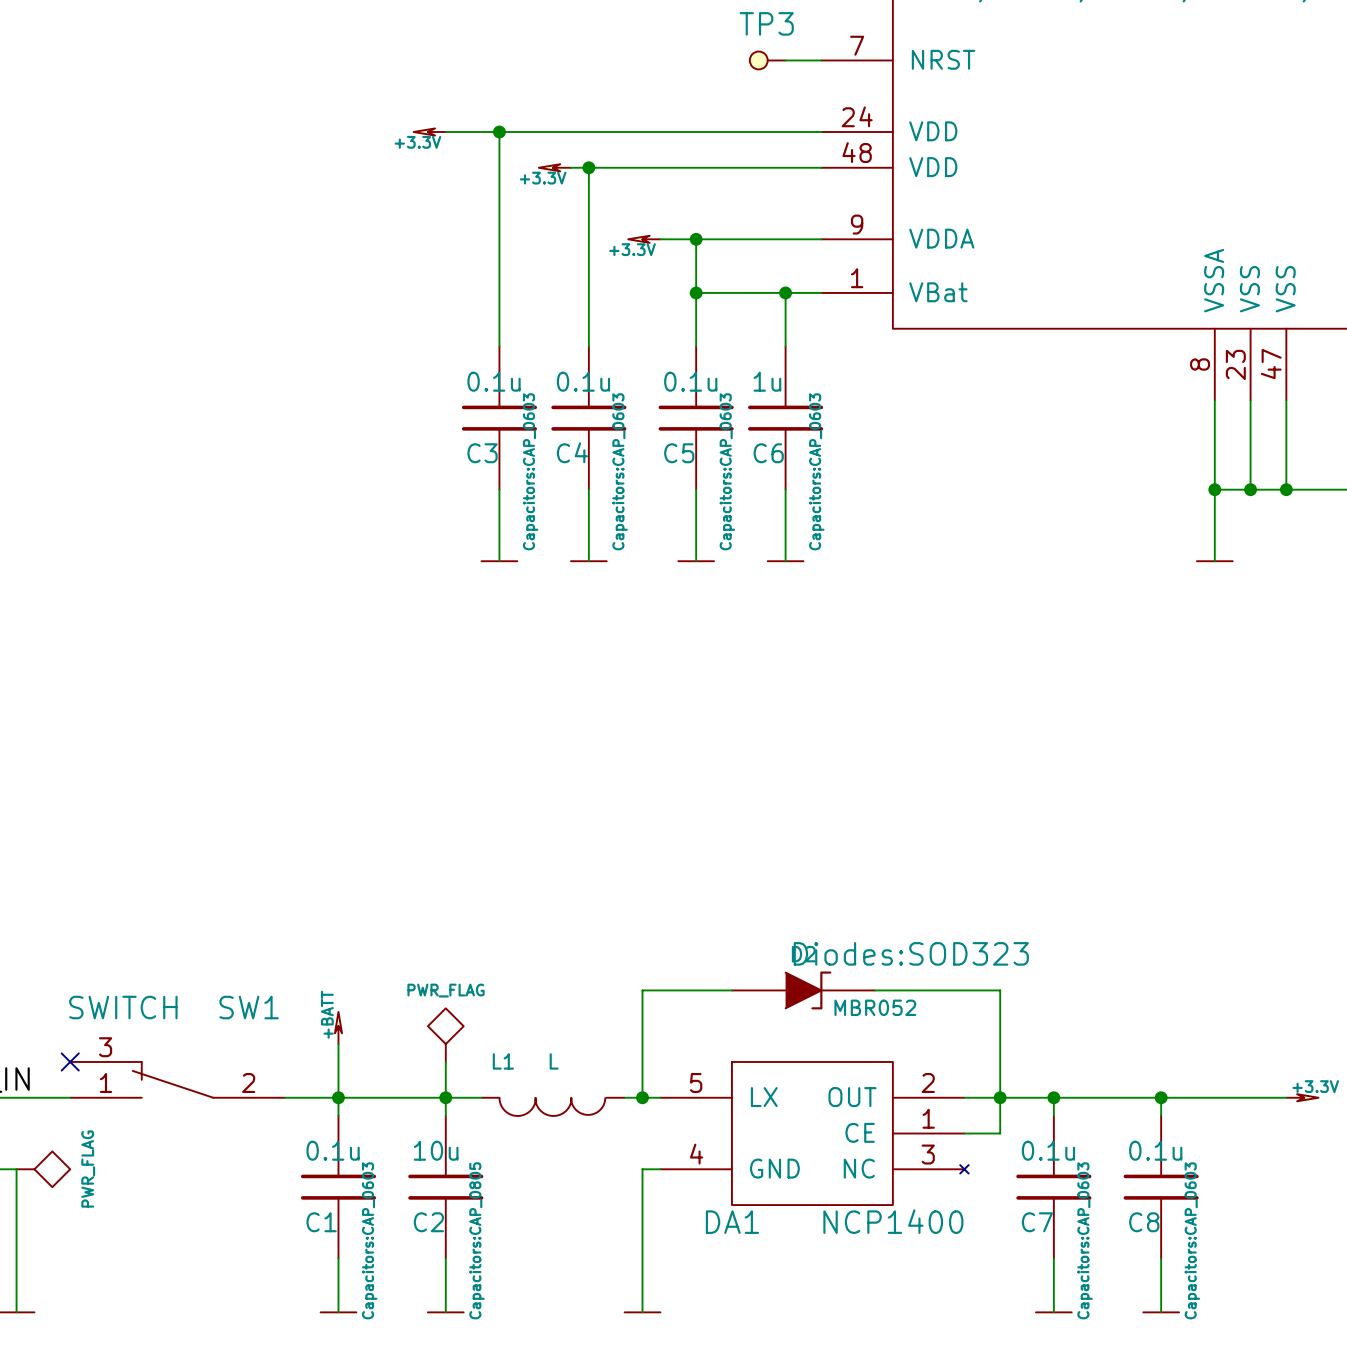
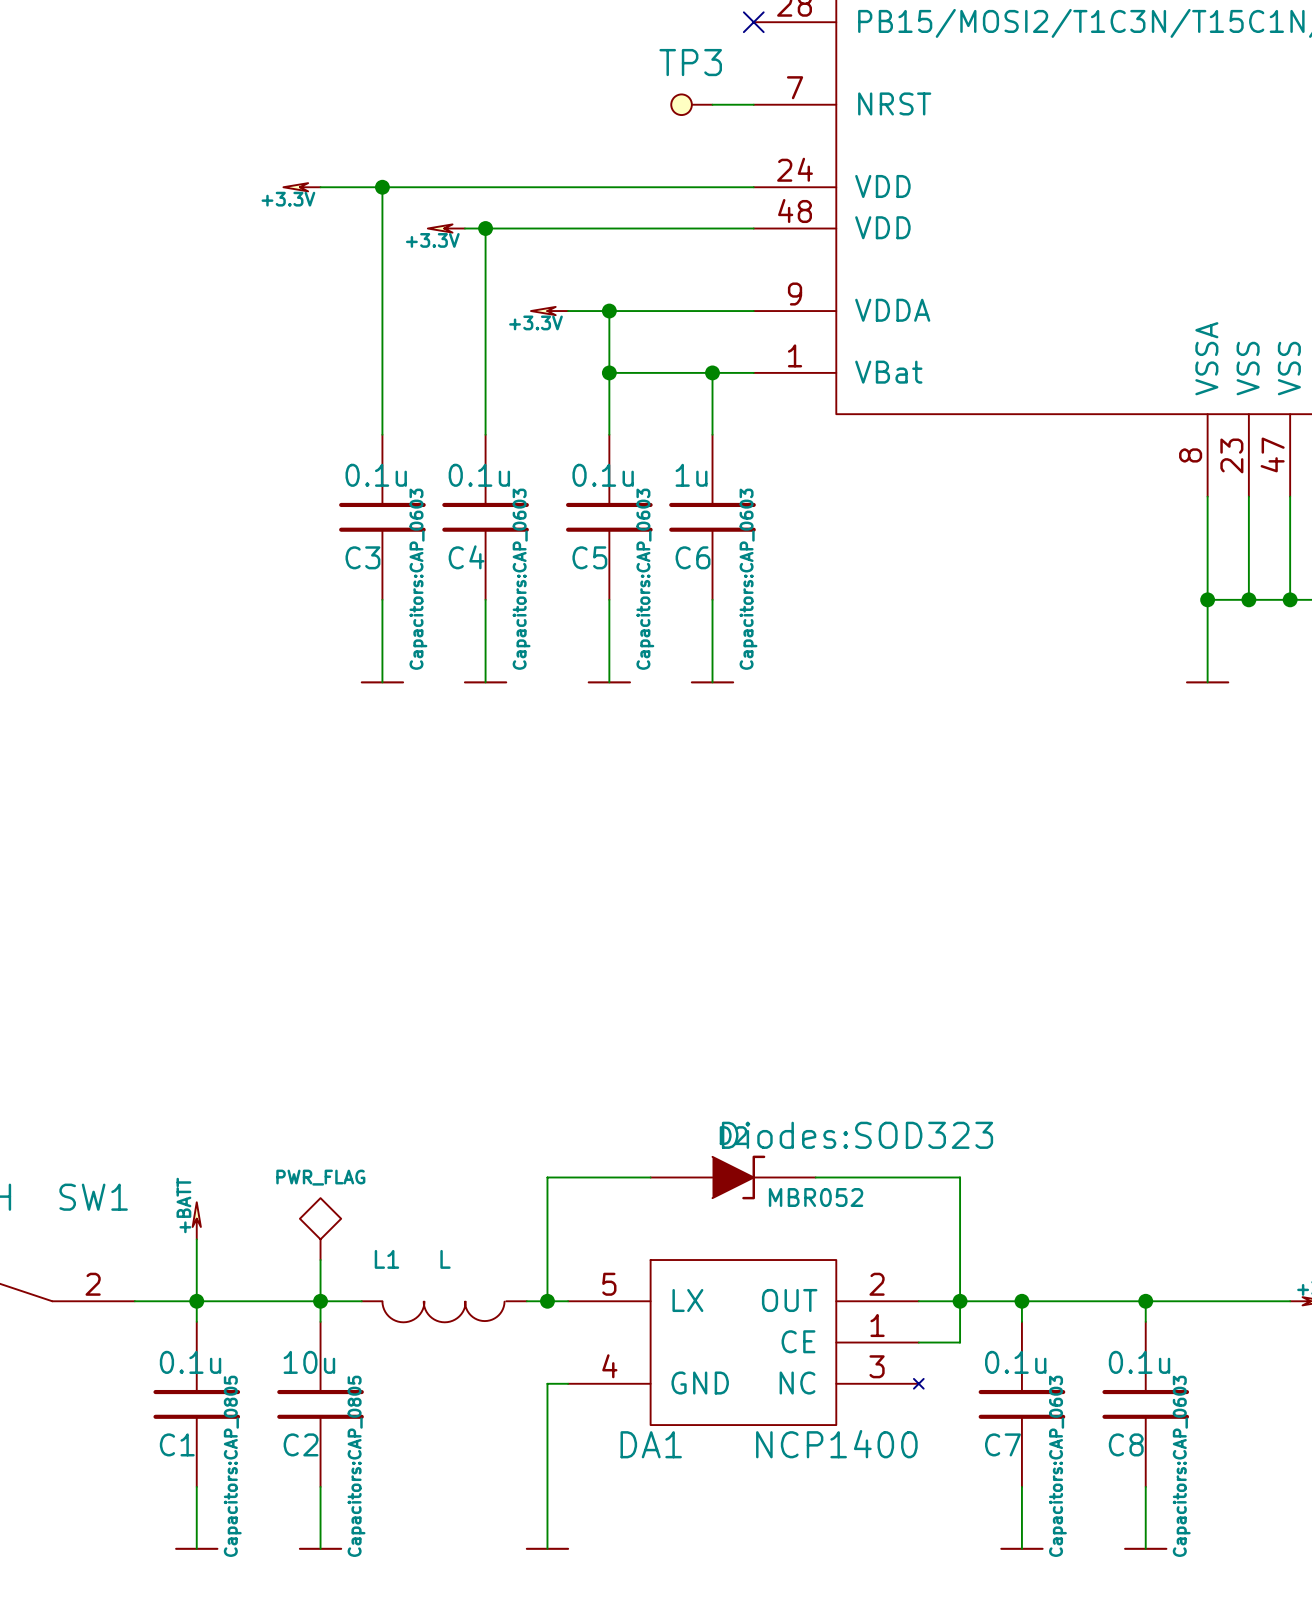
C1 text: Capacitors:CAP_0603 (369, 1240) -> Capacitors:CAP_0805 (232, 1466)

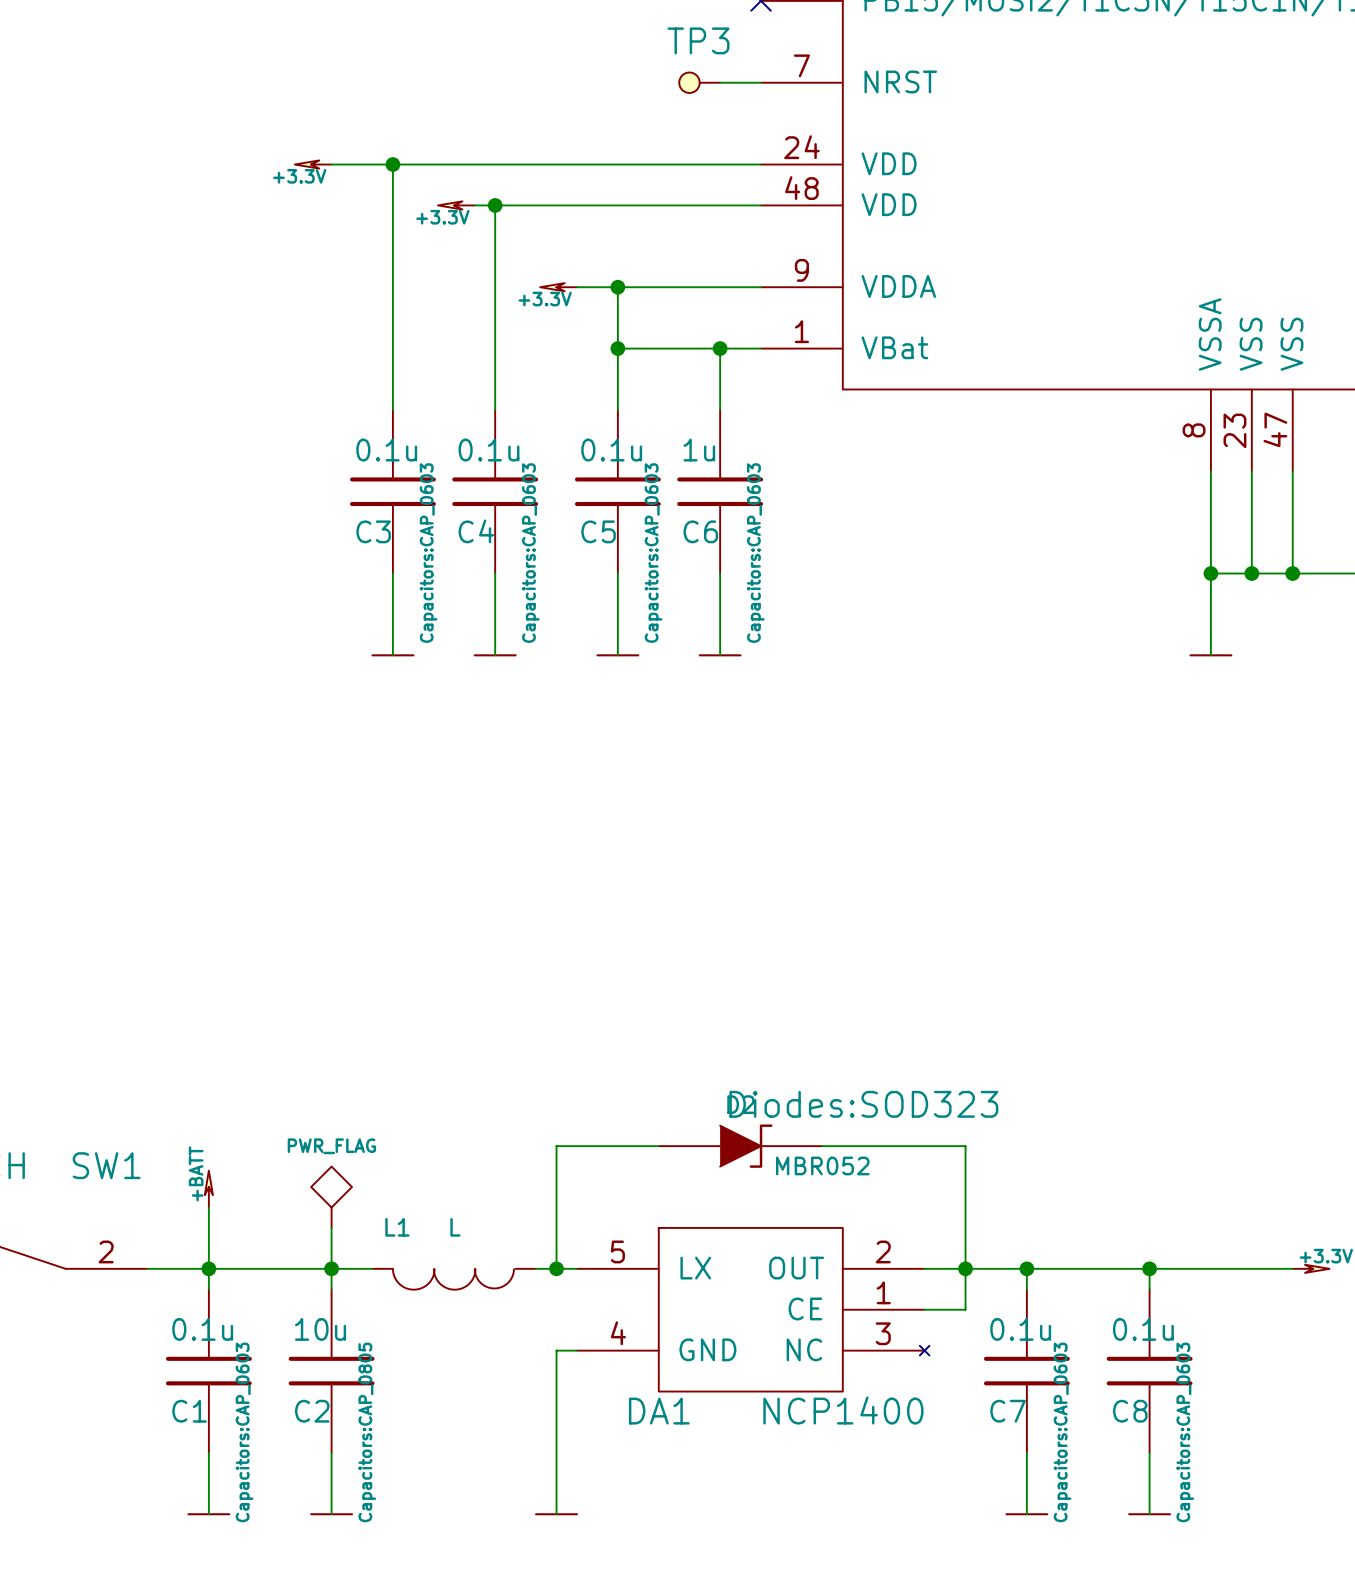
C1 text: Capacitors:CAP_0805 (232, 1466) -> Capacitors:CAP_0603 (244, 1432)

